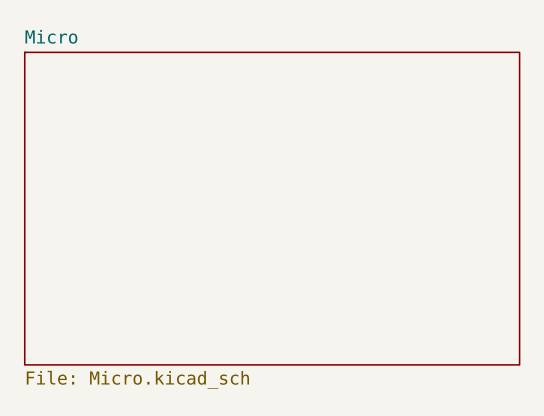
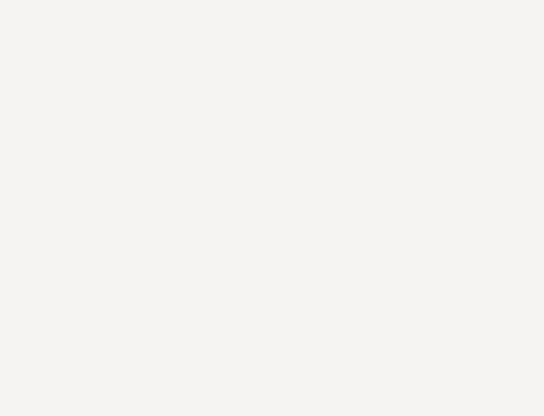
sheet Micro: File: Micro.kicad_sch (272, 208) -> none

